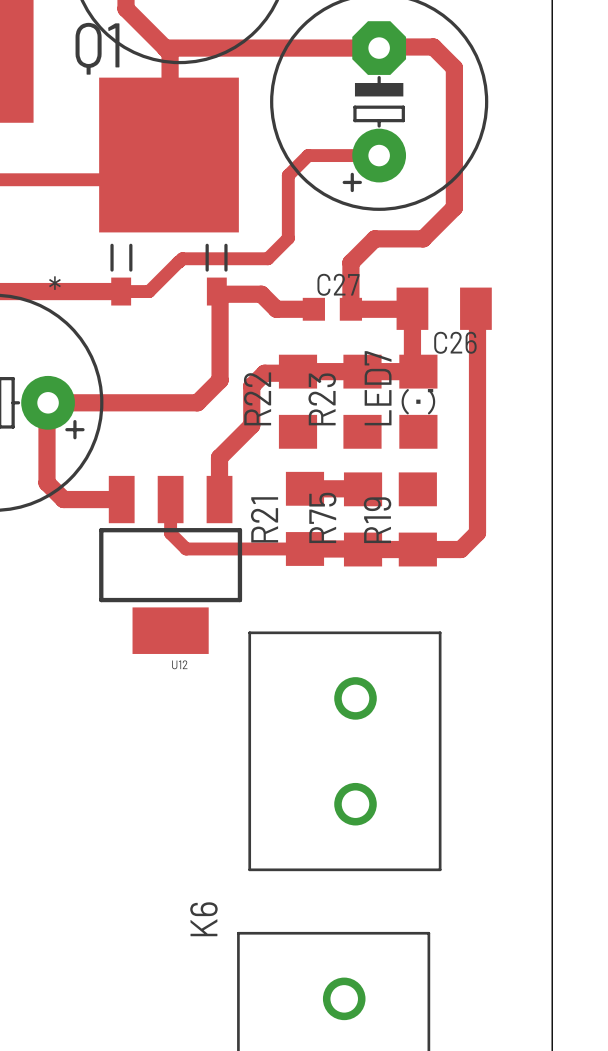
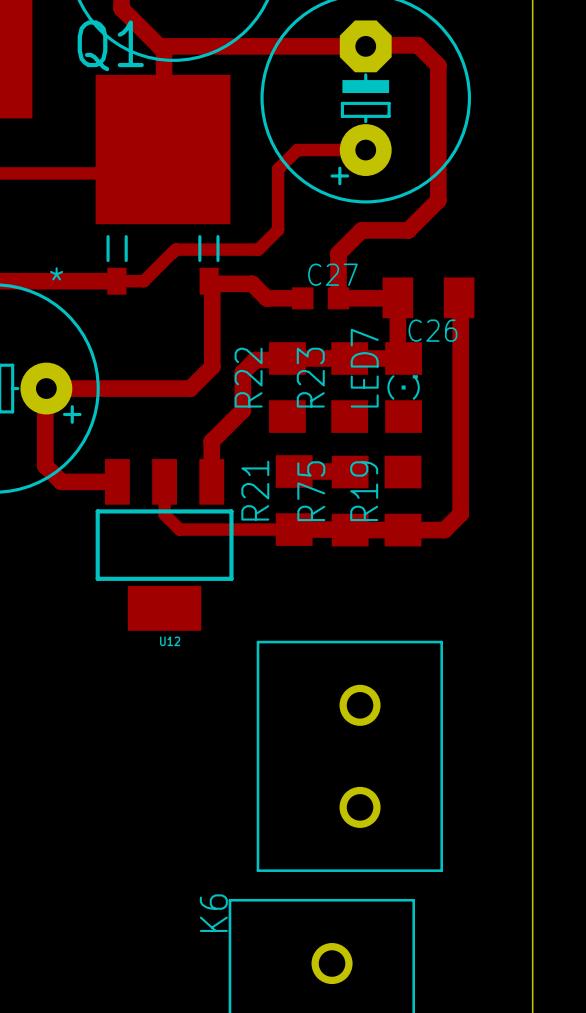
K6 position: (344, 751) -> (349, 756)

